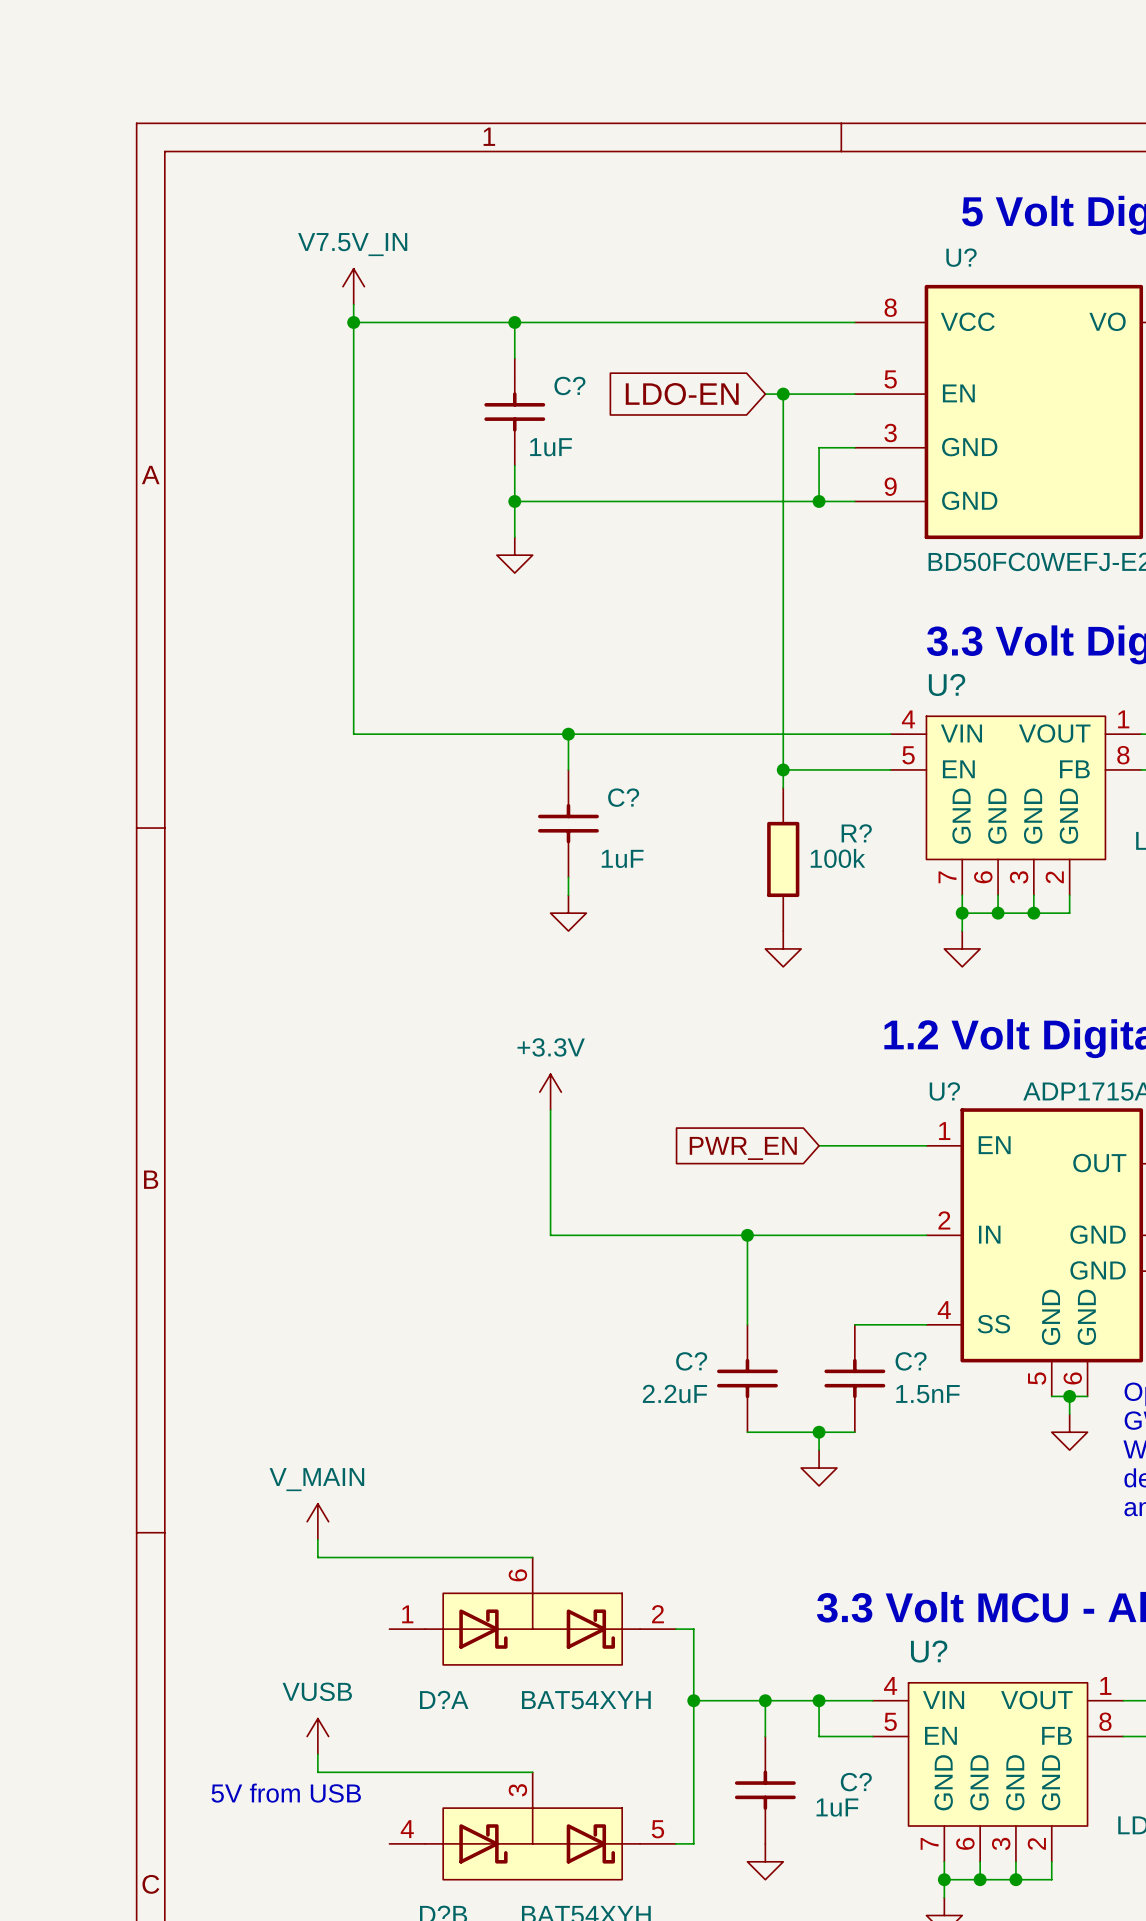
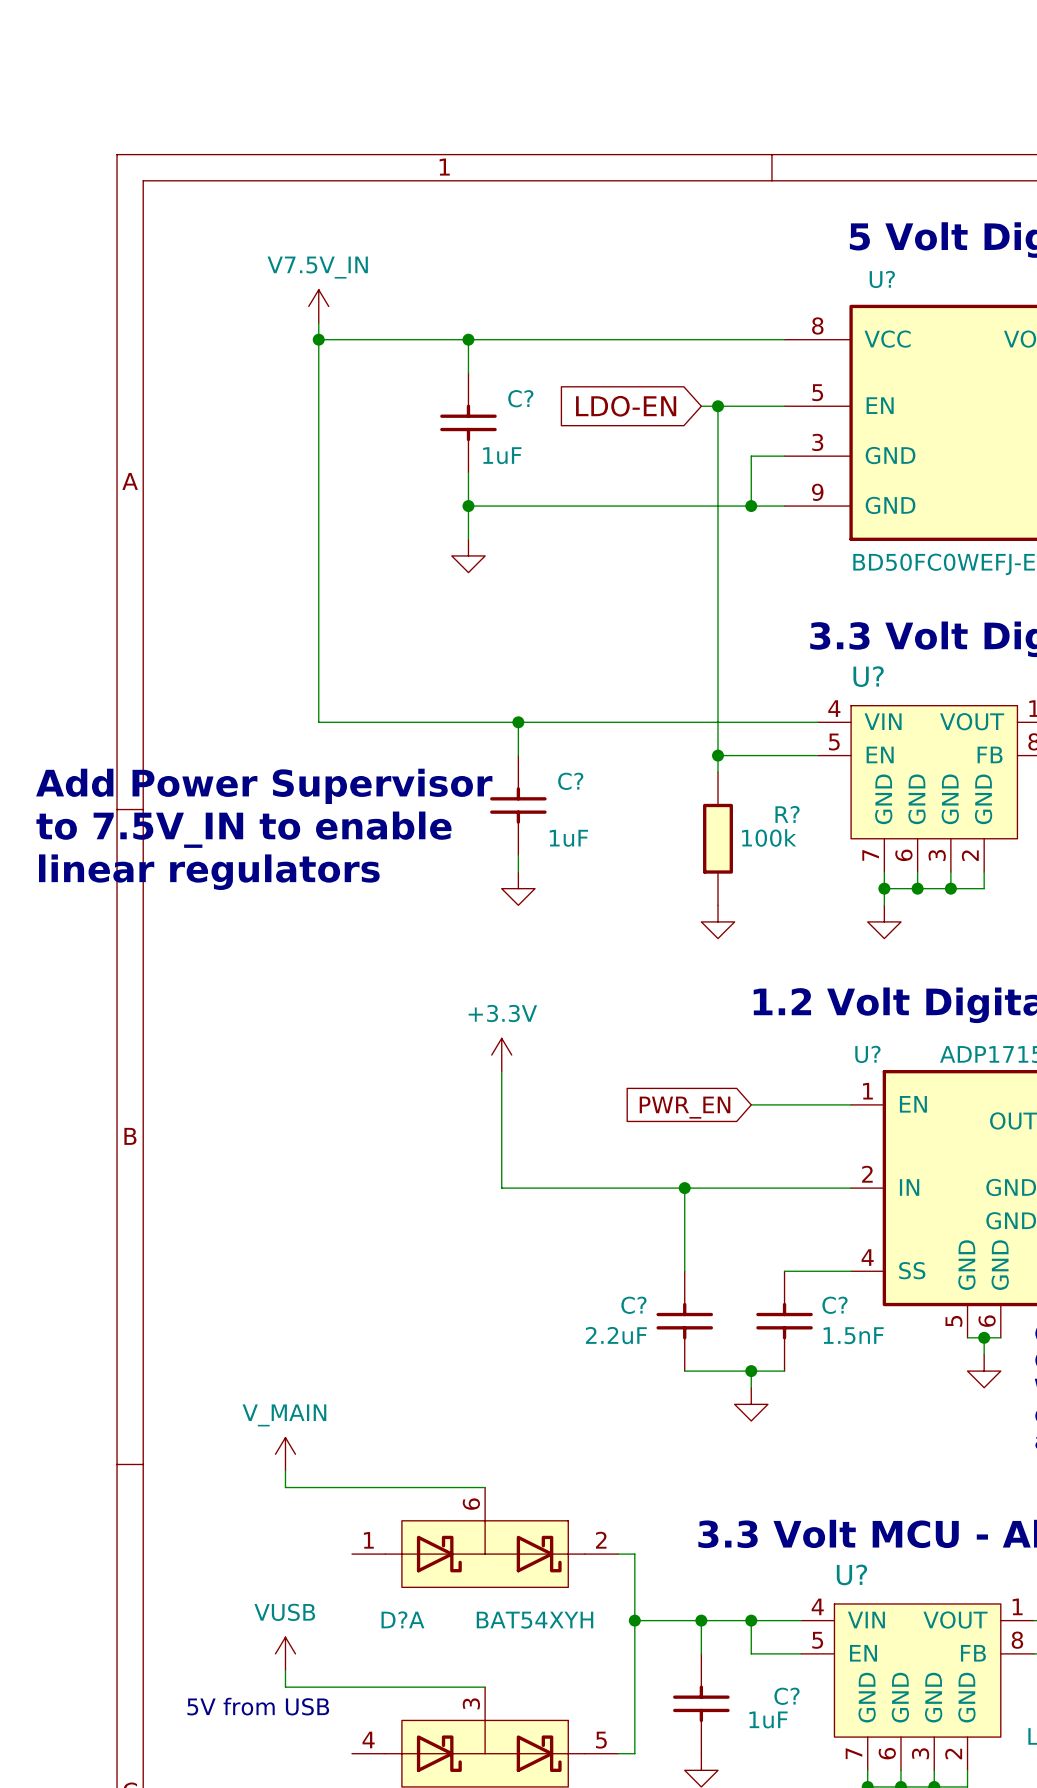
text: none -> Add Power Supervisor (264, 786)
text: none -> to 7.5V_IN to enable (243, 829)
text: none -> linear regulators (209, 872)

